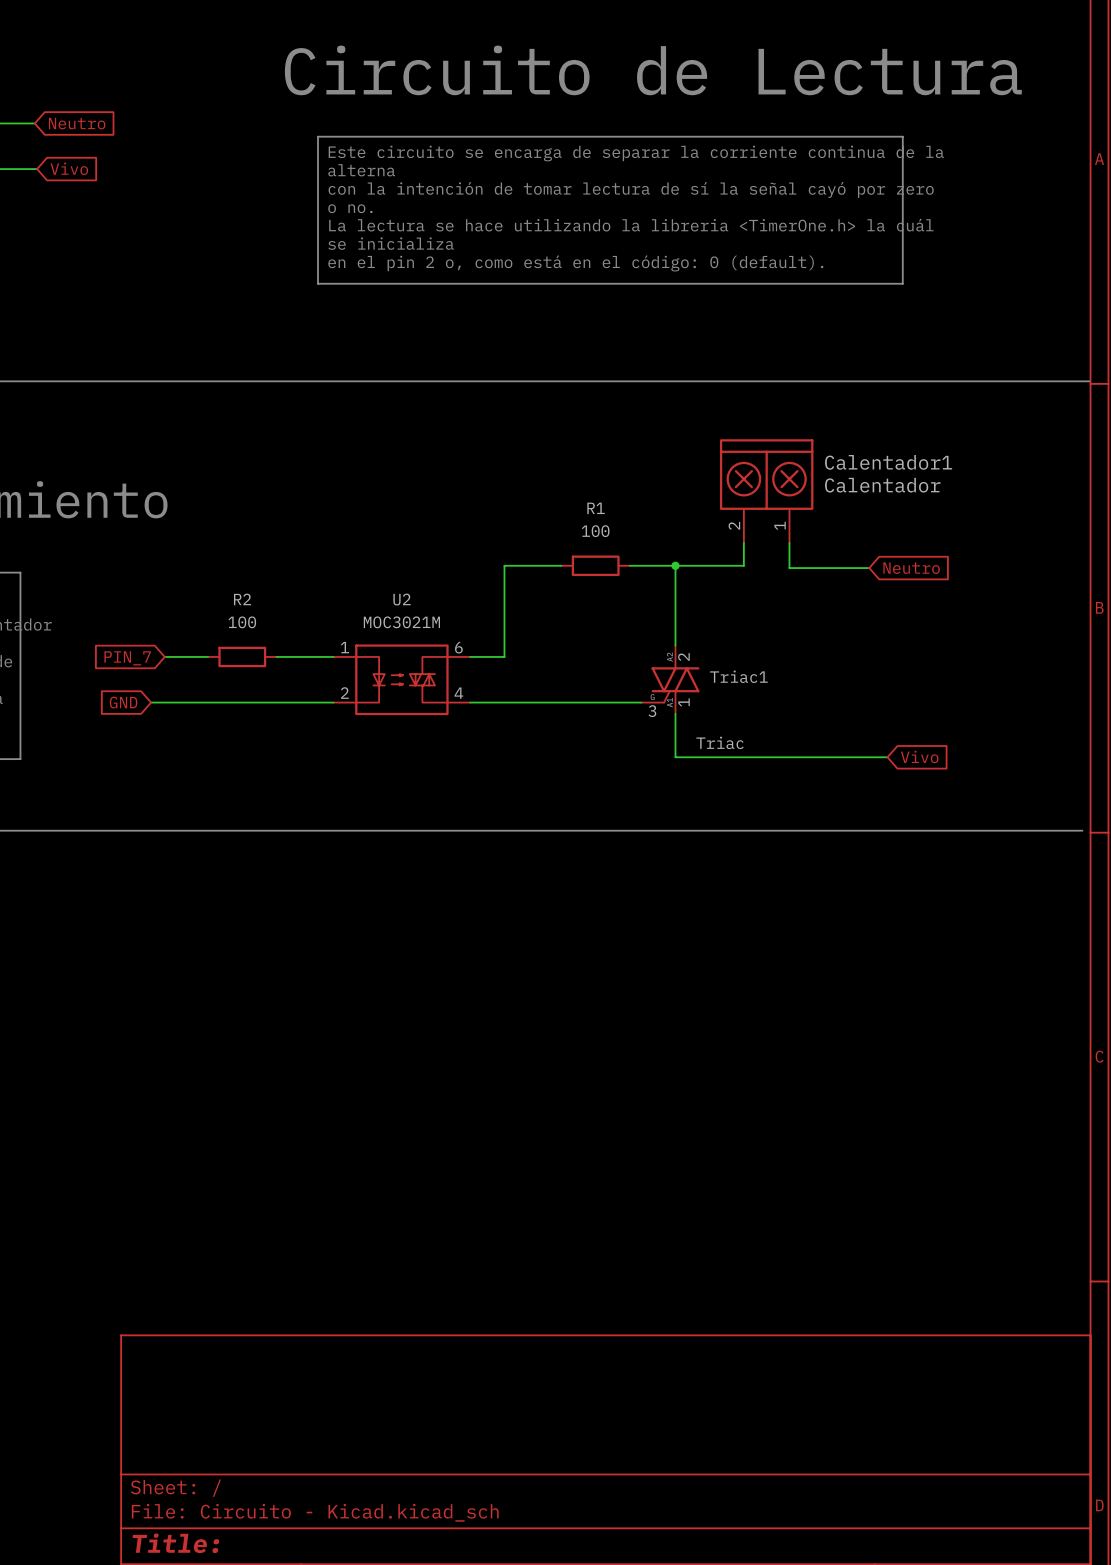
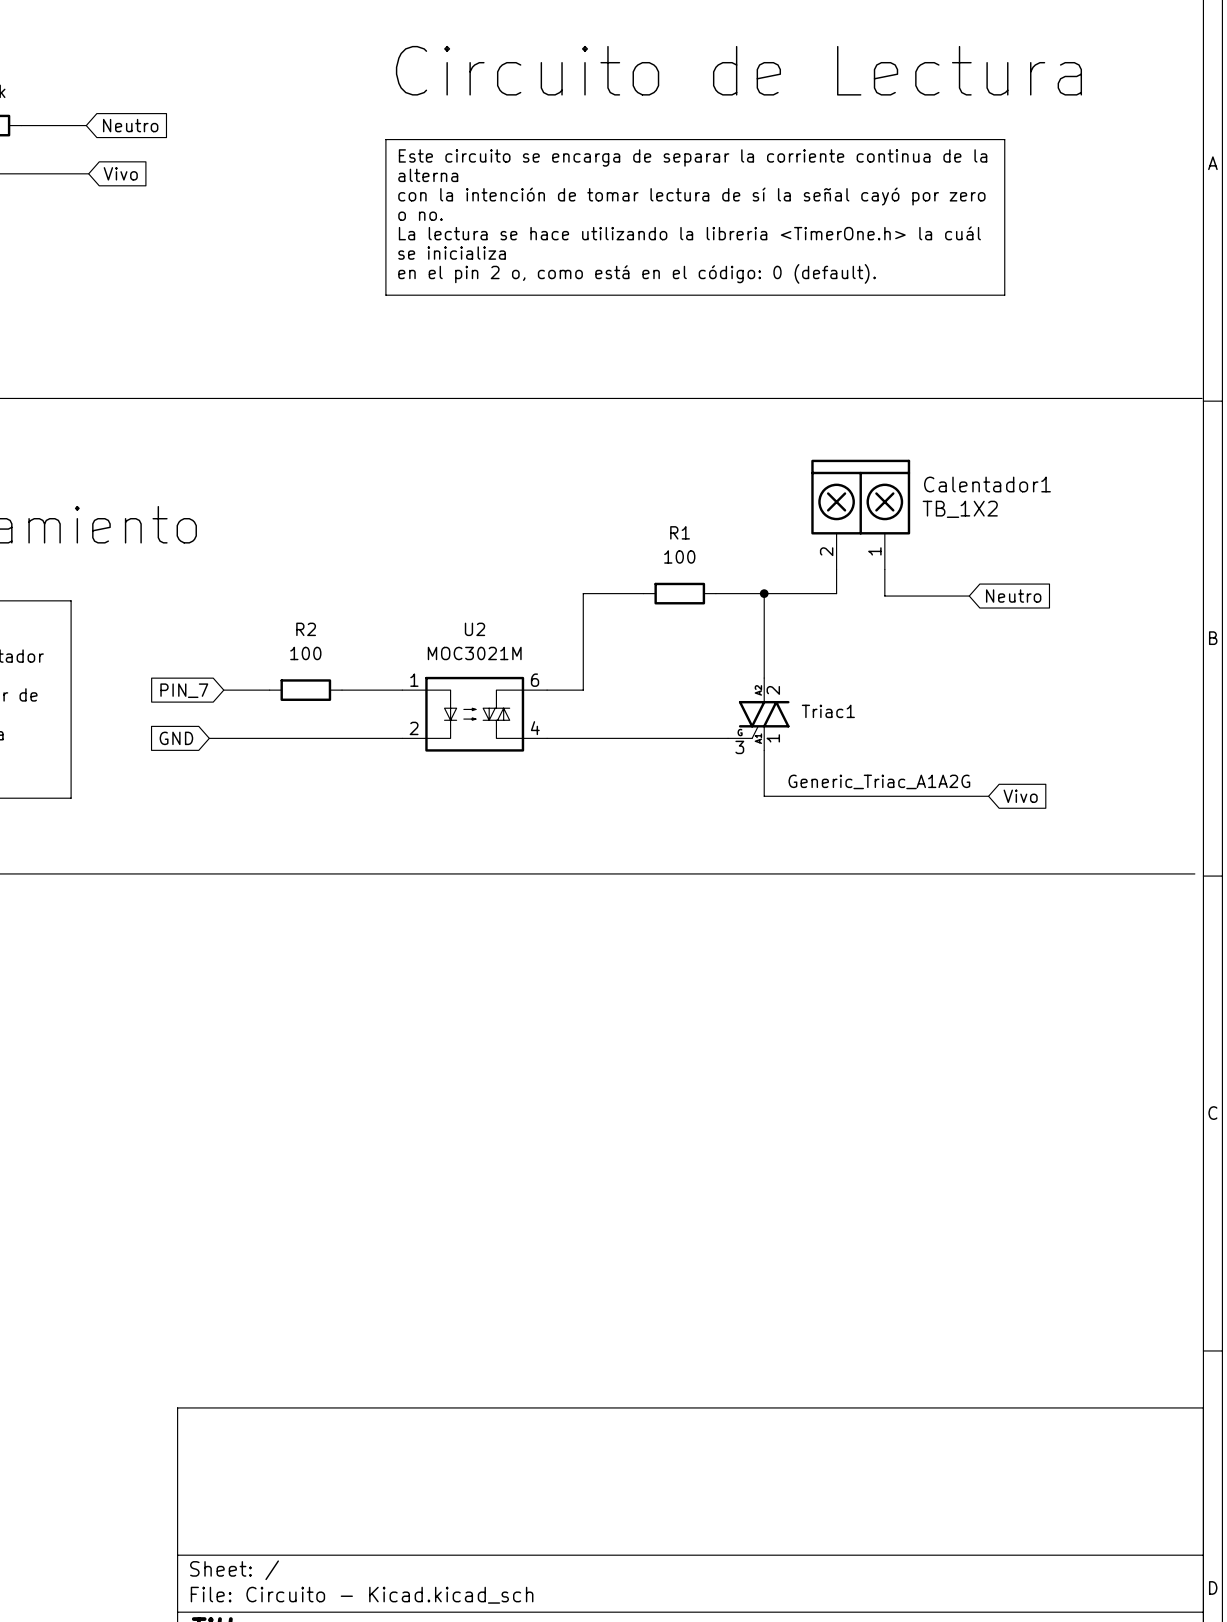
Calentador1 value: Calentador (882, 485) -> TB_1X2 (960, 509)
Triac1 value: Triac (720, 742) -> Generic_Triac_A1A2G (879, 781)

